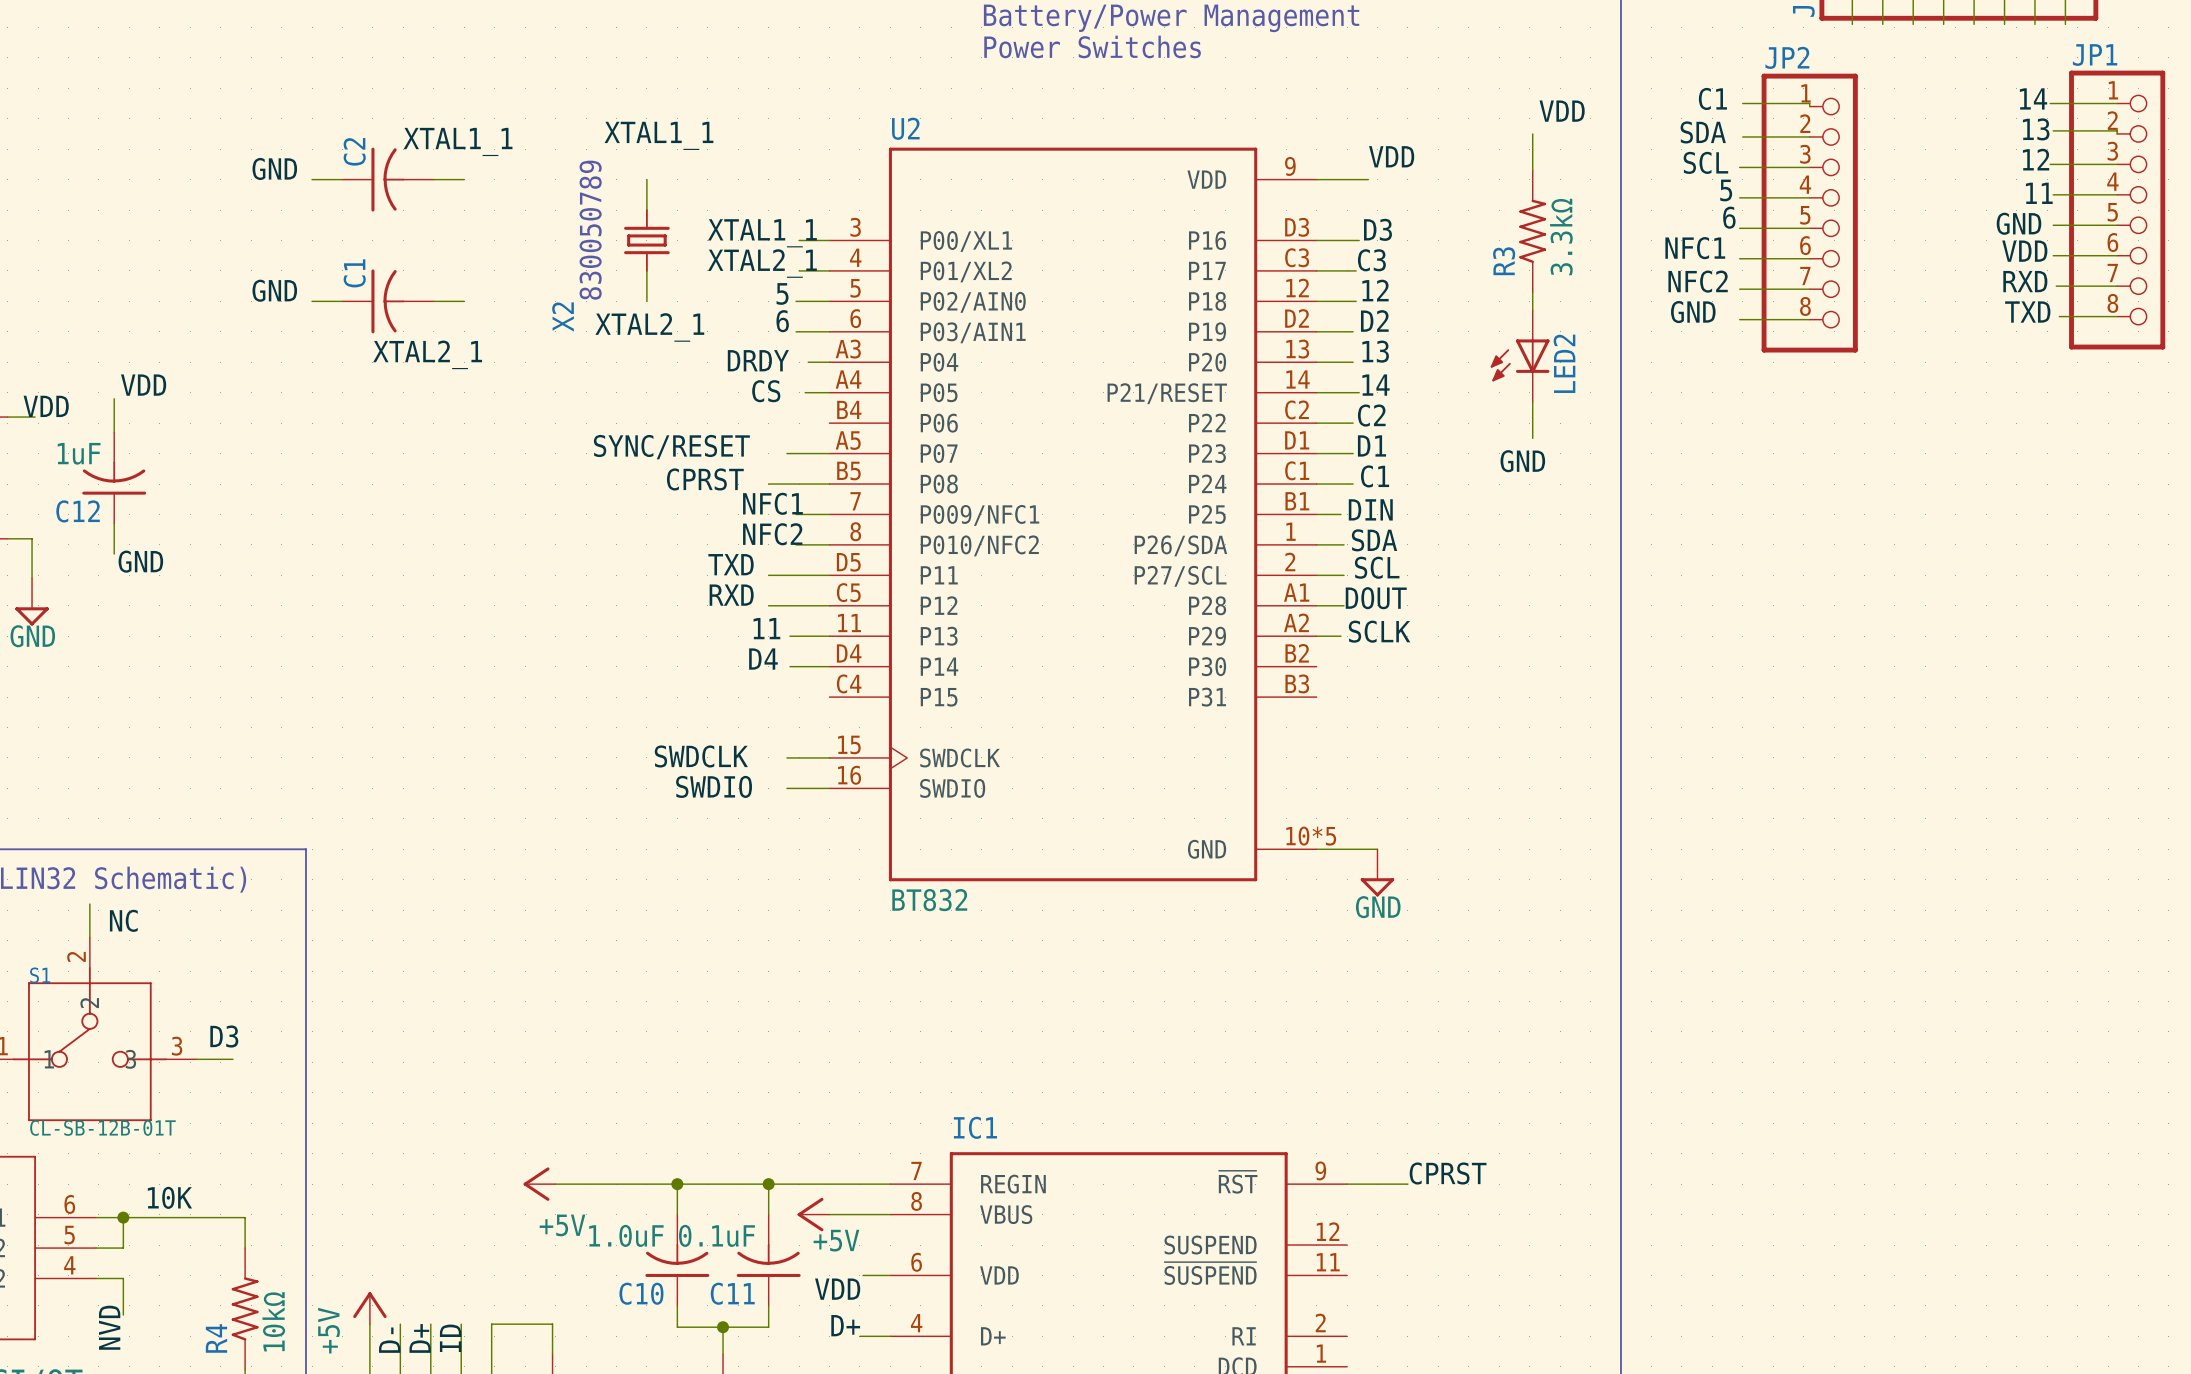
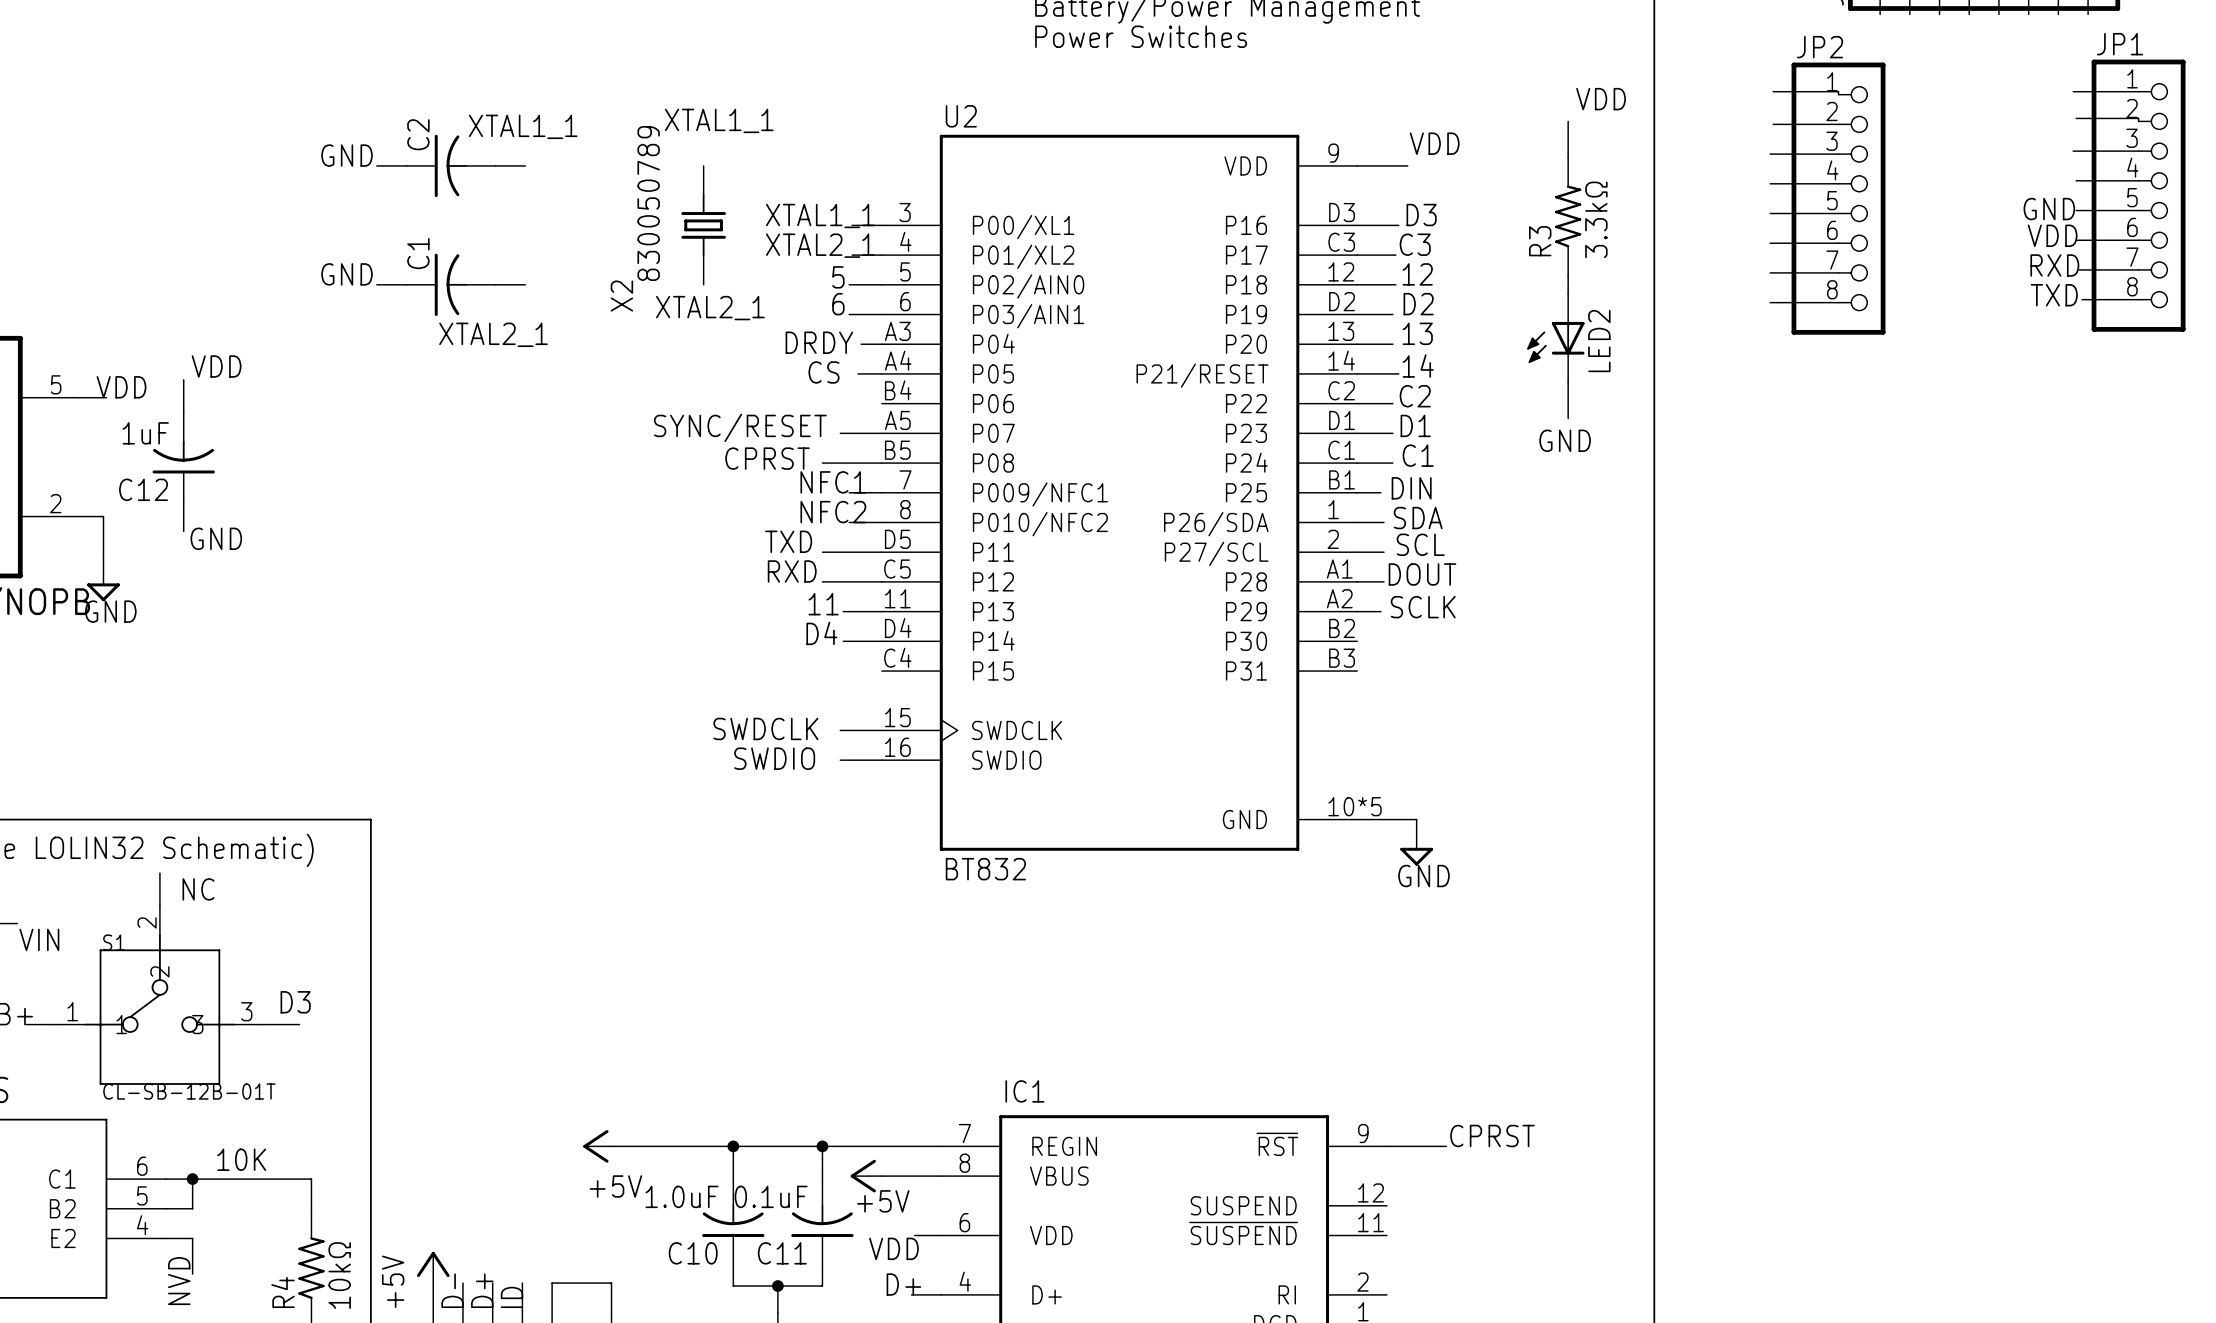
label: C1 (1712, 98) -> none
label: 14 (2033, 98) -> none
label: 13 (2036, 129) -> none
label: SDA (1703, 132) -> none
label: 12 (2036, 159) -> none
label: SCL (1705, 162) -> none
label: 5 (1726, 190) -> none
label: 11 (2039, 193) -> none
label: 6 (1729, 217) -> none
label: NFC1 (1695, 248) -> none
label: NFC2 (1698, 281) -> none
label: GND (1693, 312) -> none

